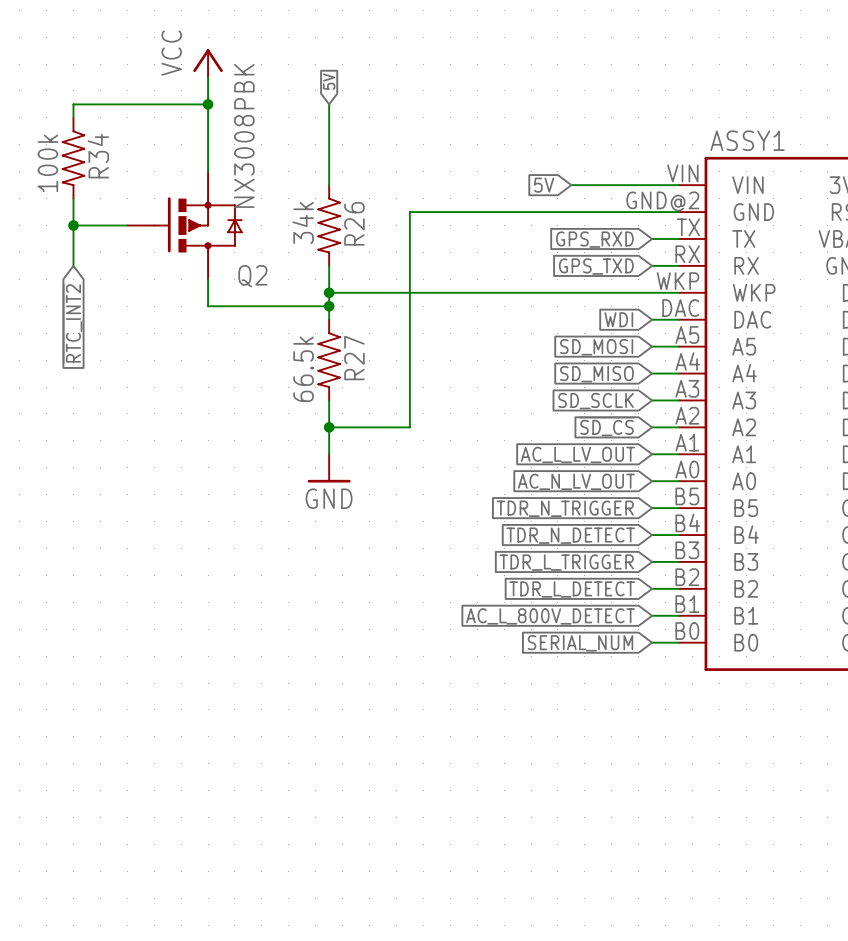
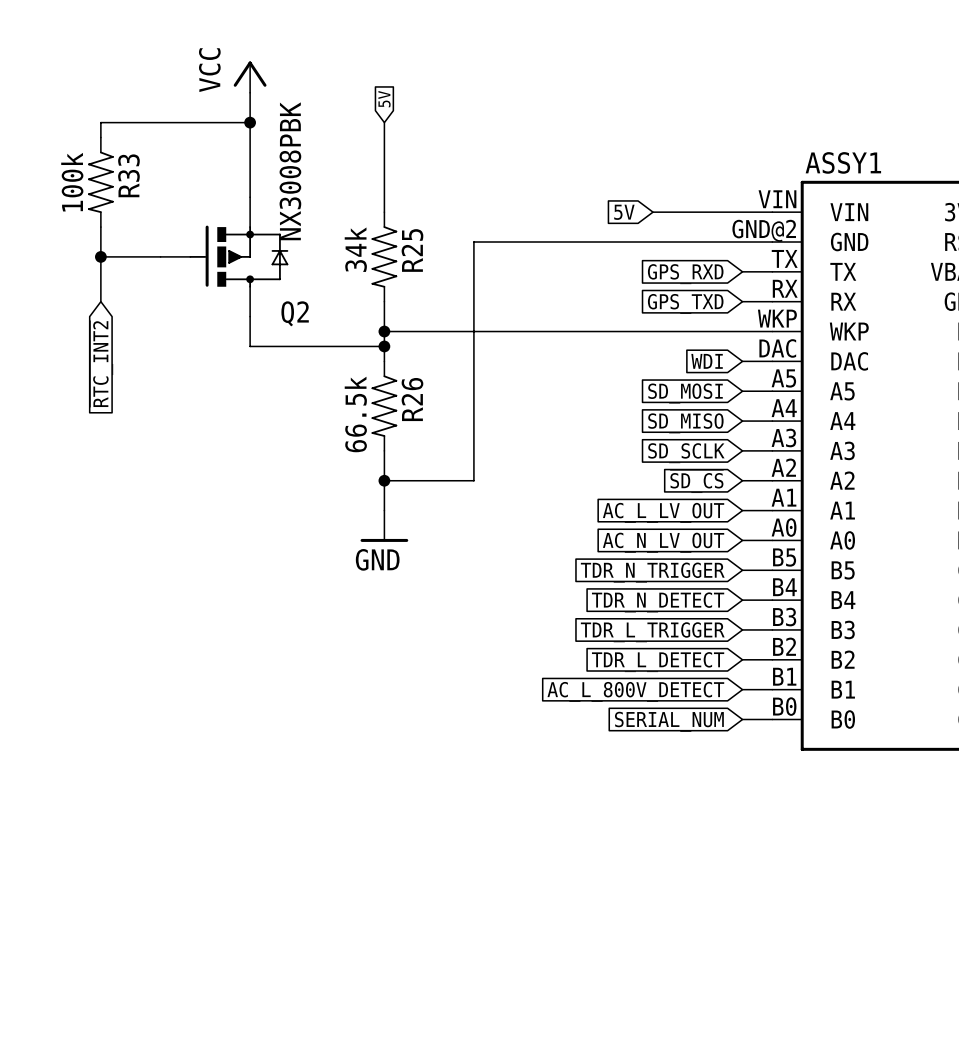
R34 name: R34 (98, 156) -> R33 (128, 175)
R26 name: R26 (354, 223) -> R25 (412, 250)
R27 name: R27 (354, 357) -> R26 (412, 399)

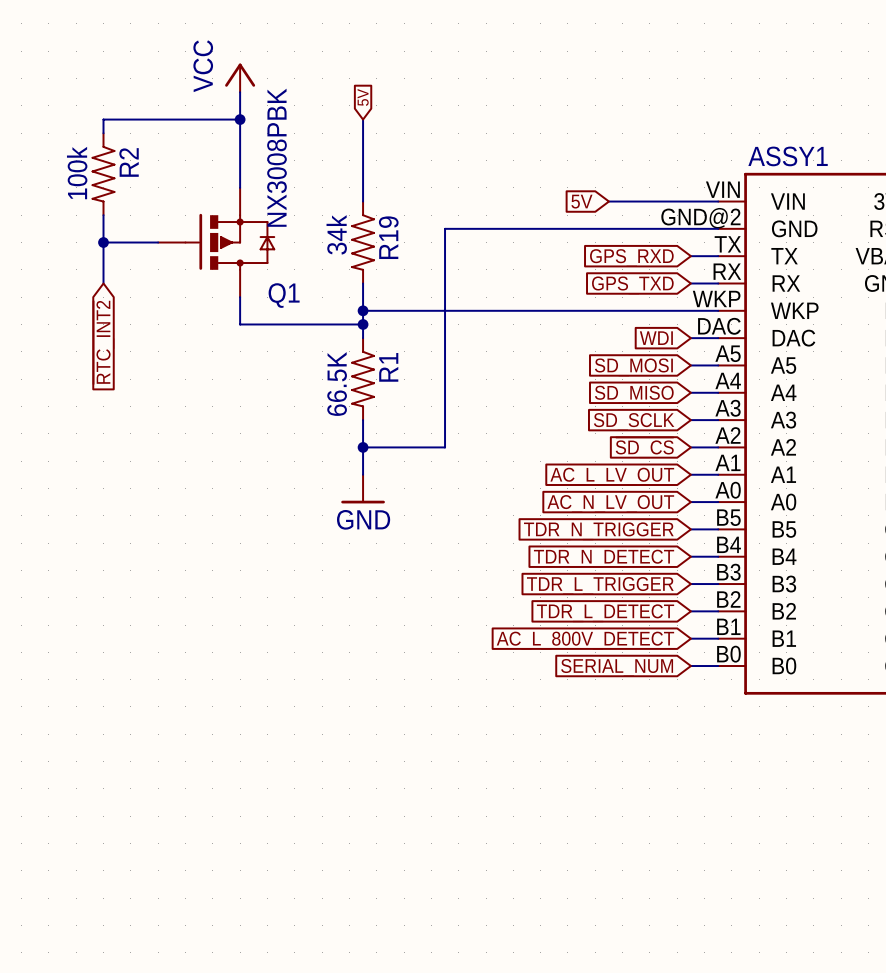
R33 name: R33 (128, 175) -> R2 (129, 162)
R25 name: R25 (412, 250) -> R19 (388, 237)
Q2 name: Q2 (295, 313) -> Q1 (284, 295)
R26 name: R26 (412, 399) -> R1 (388, 367)
R26 value: 66.5k (355, 414) -> 66.5K (337, 384)

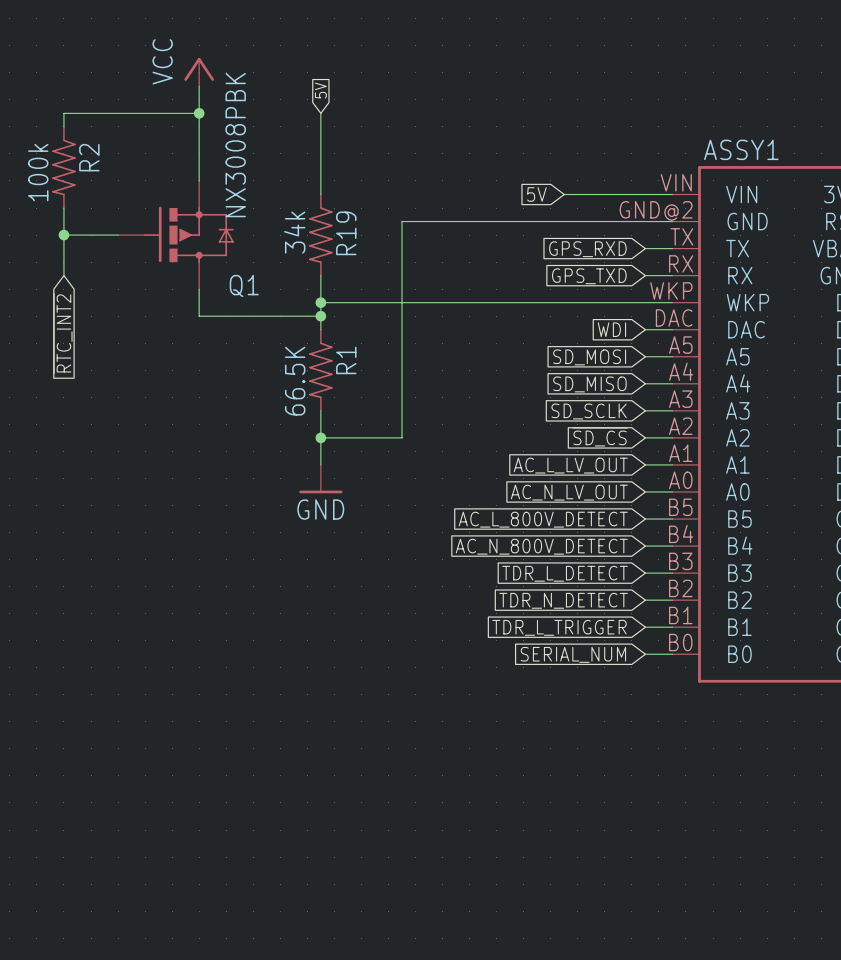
global label: TDR_N_TRIGGER (598, 531) -> AC_L_800V_DETECT (543, 519)
global label: TDR_N_DETECT (604, 558) -> AC_N_800V_DETECT (541, 546)
global label: TDR_L_TRIGGER (600, 585) -> TDR_L_DETECT (565, 573)
global label: TDR_L_DETECT (605, 613) -> TDR_N_DETECT (563, 600)
global label: AC_L_800V_DETECT (585, 640) -> TDR_L_TRIGGER (559, 627)

